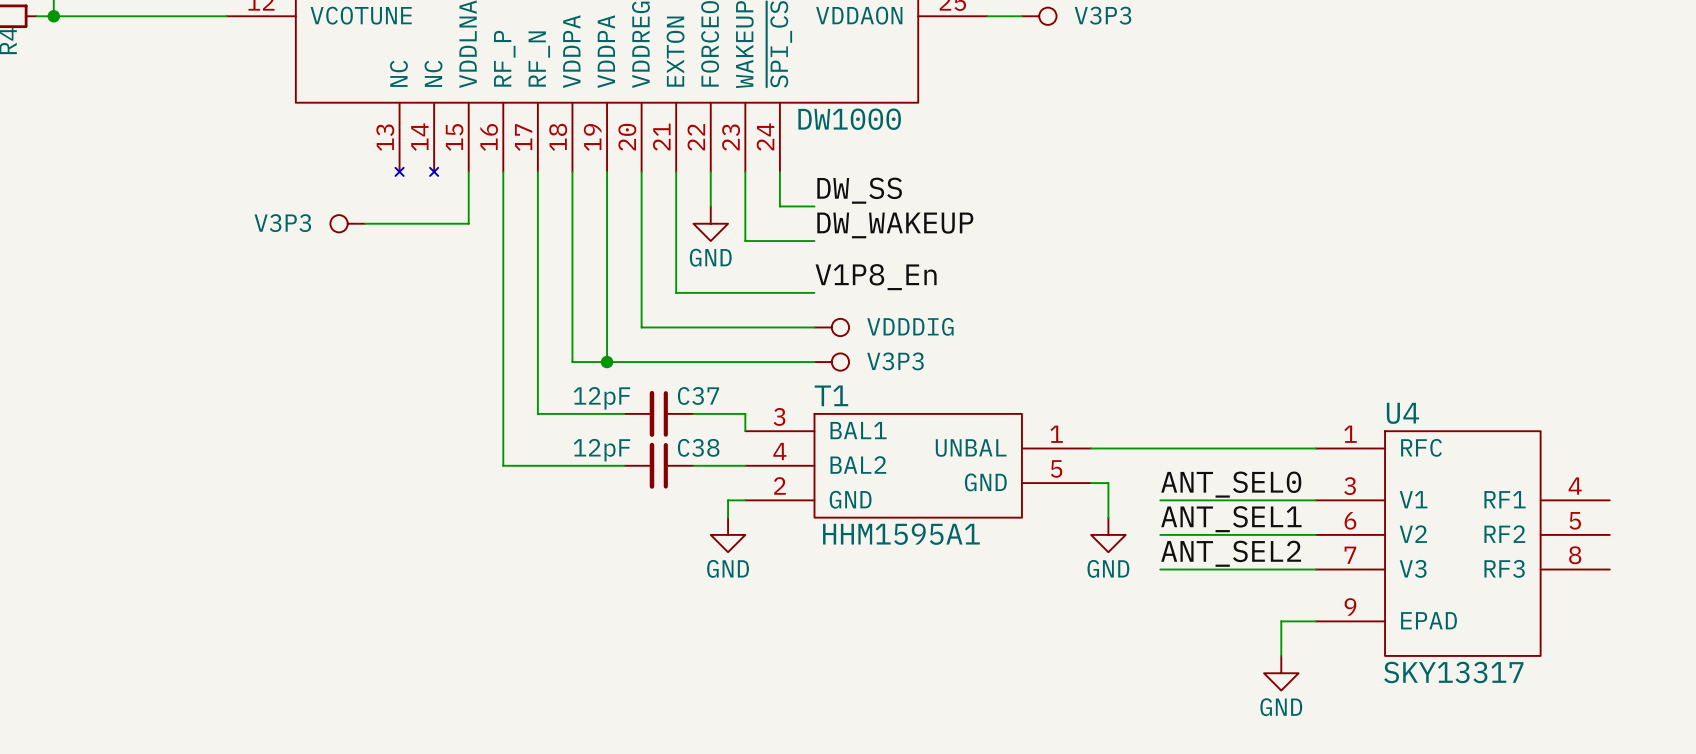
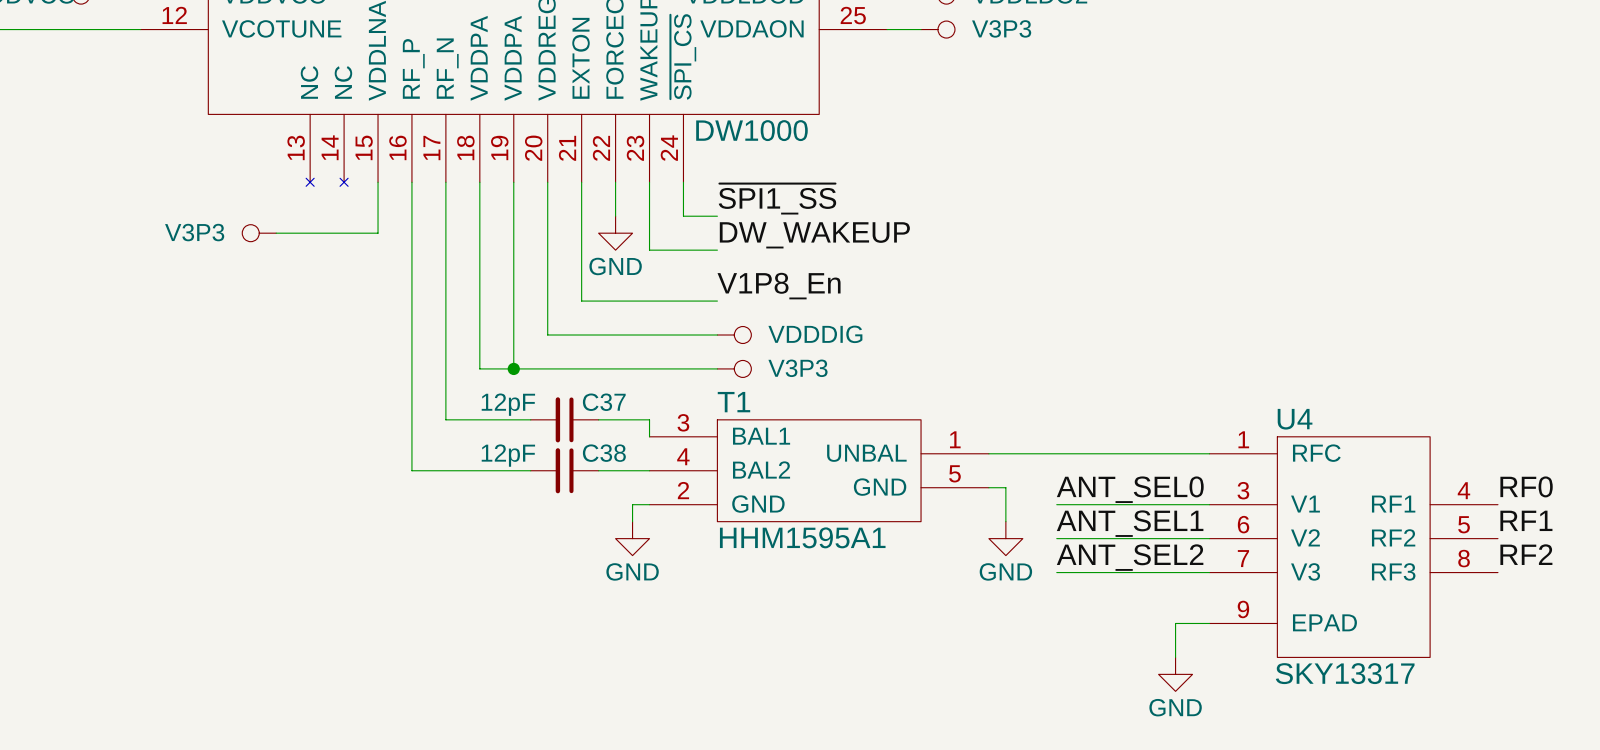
label: DW_SS (859, 190) -> ~{SPI1_SS} (777, 199)
label: none -> RF0 (1526, 486)
label: none -> RF1 (1526, 520)
label: none -> RF2 (1526, 554)

